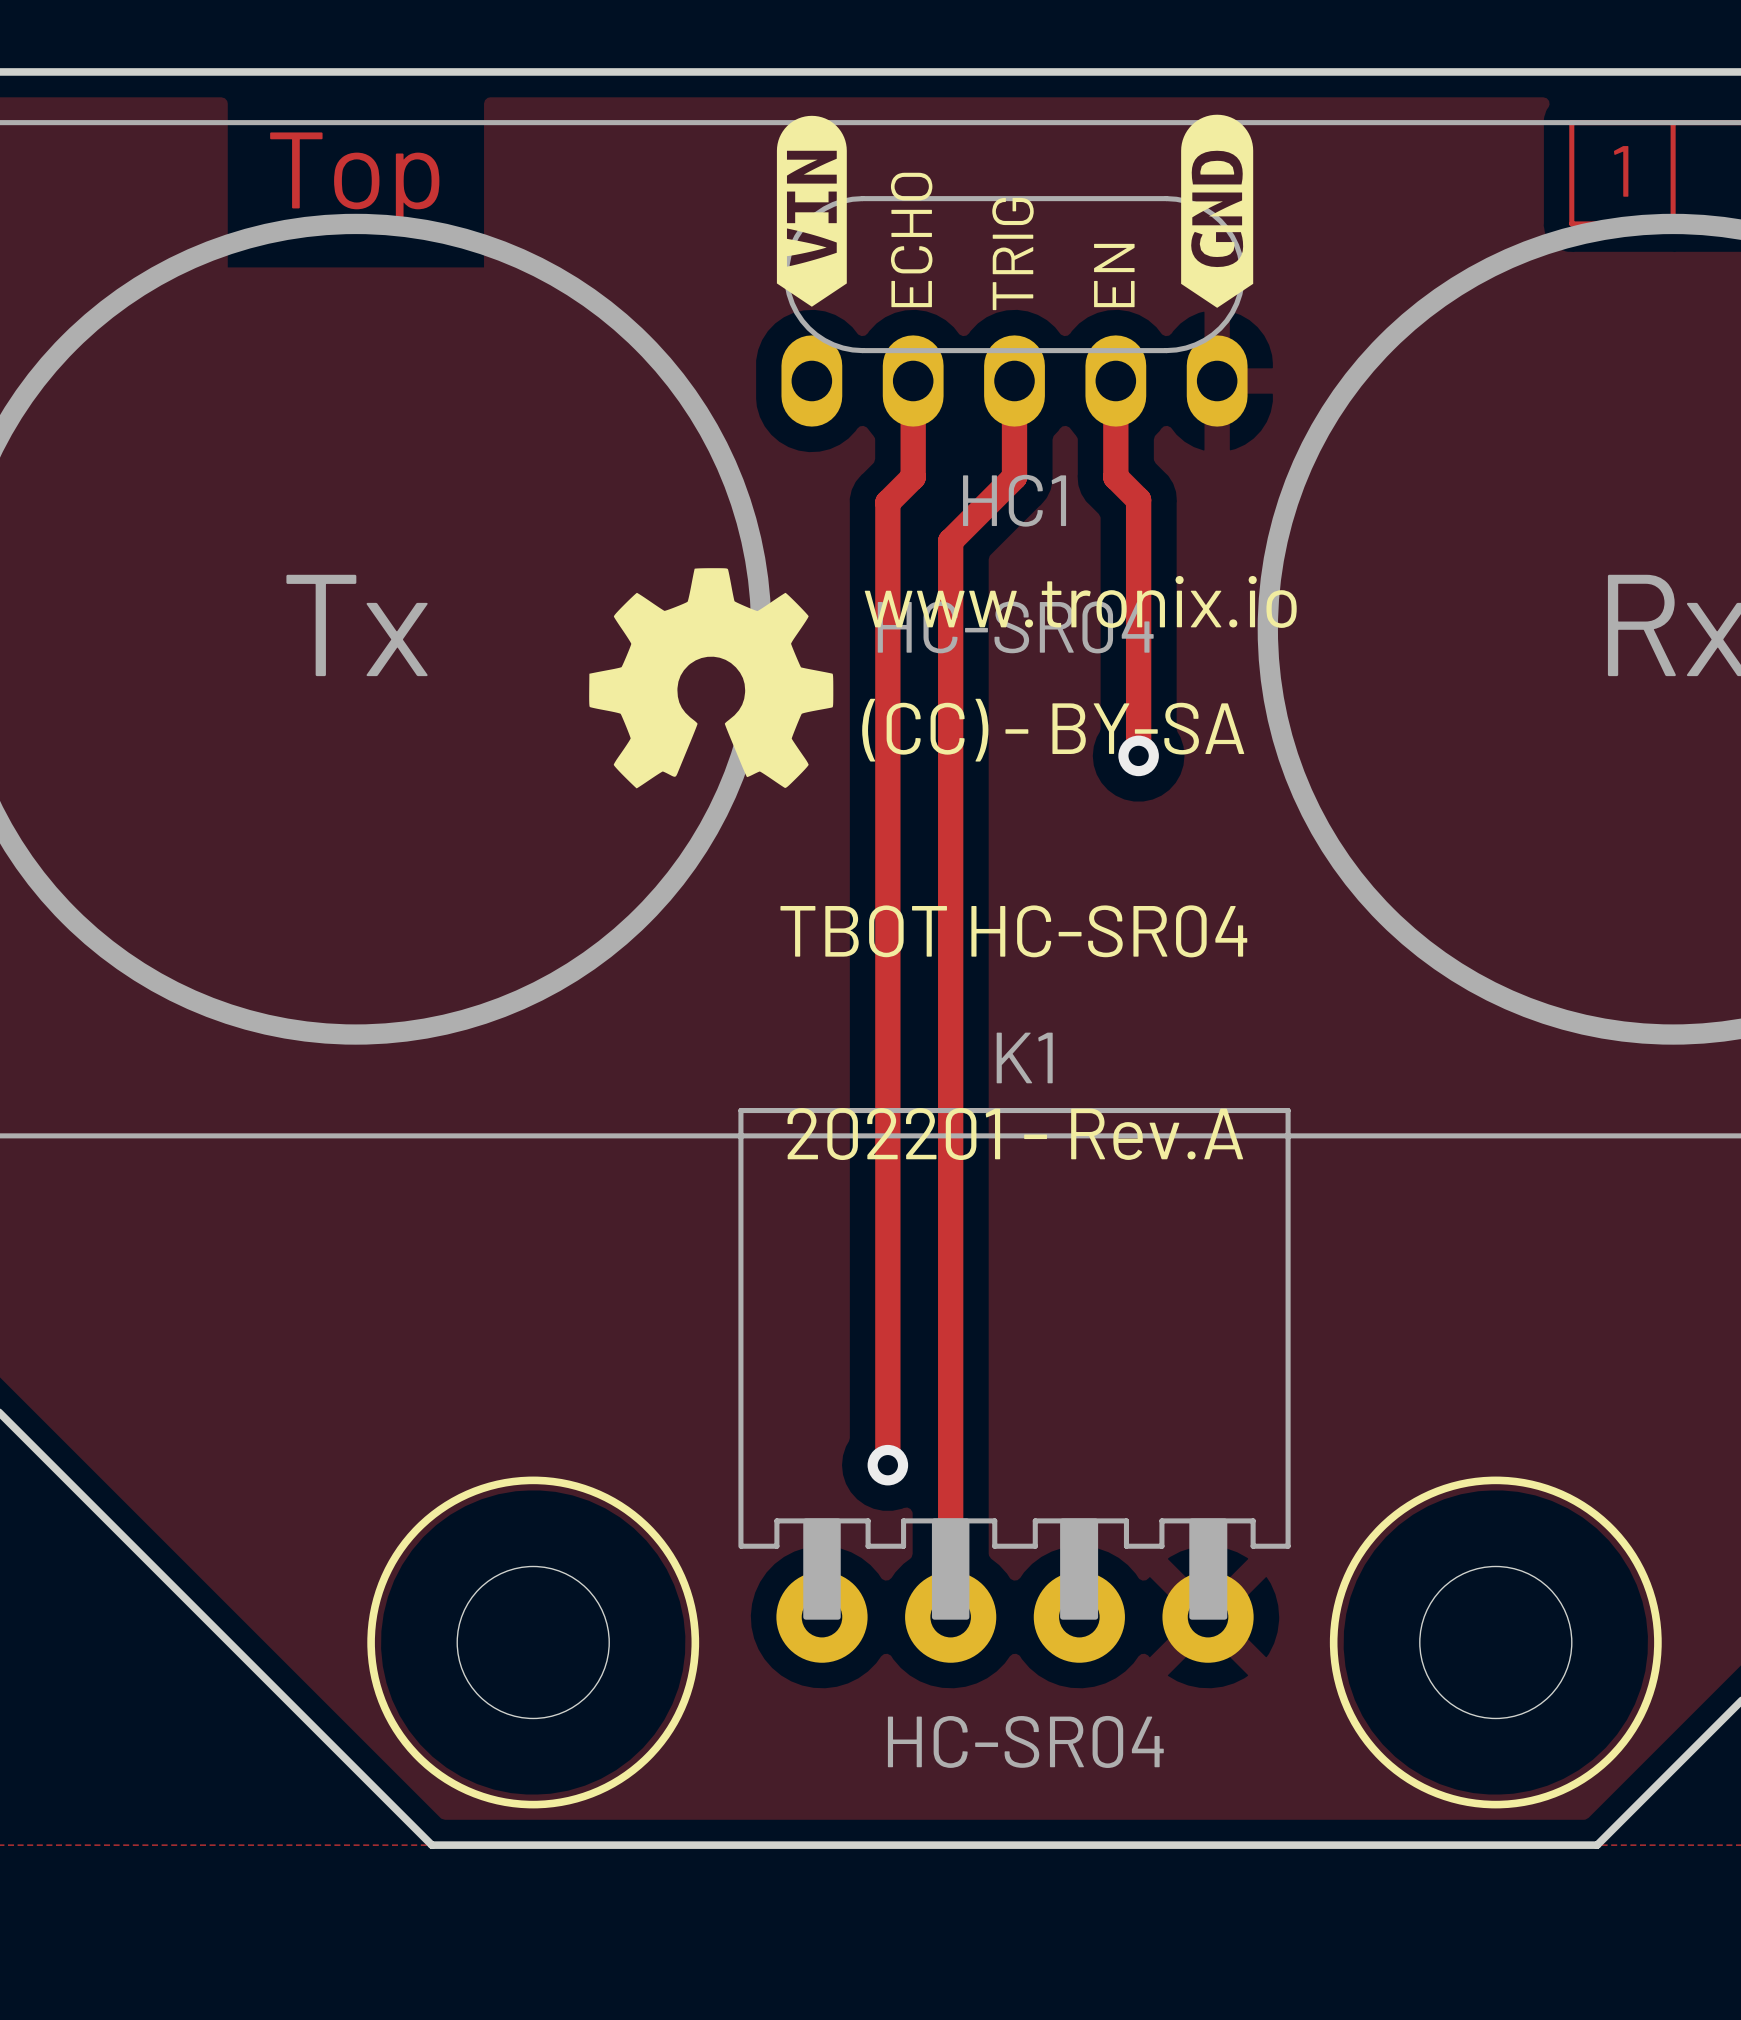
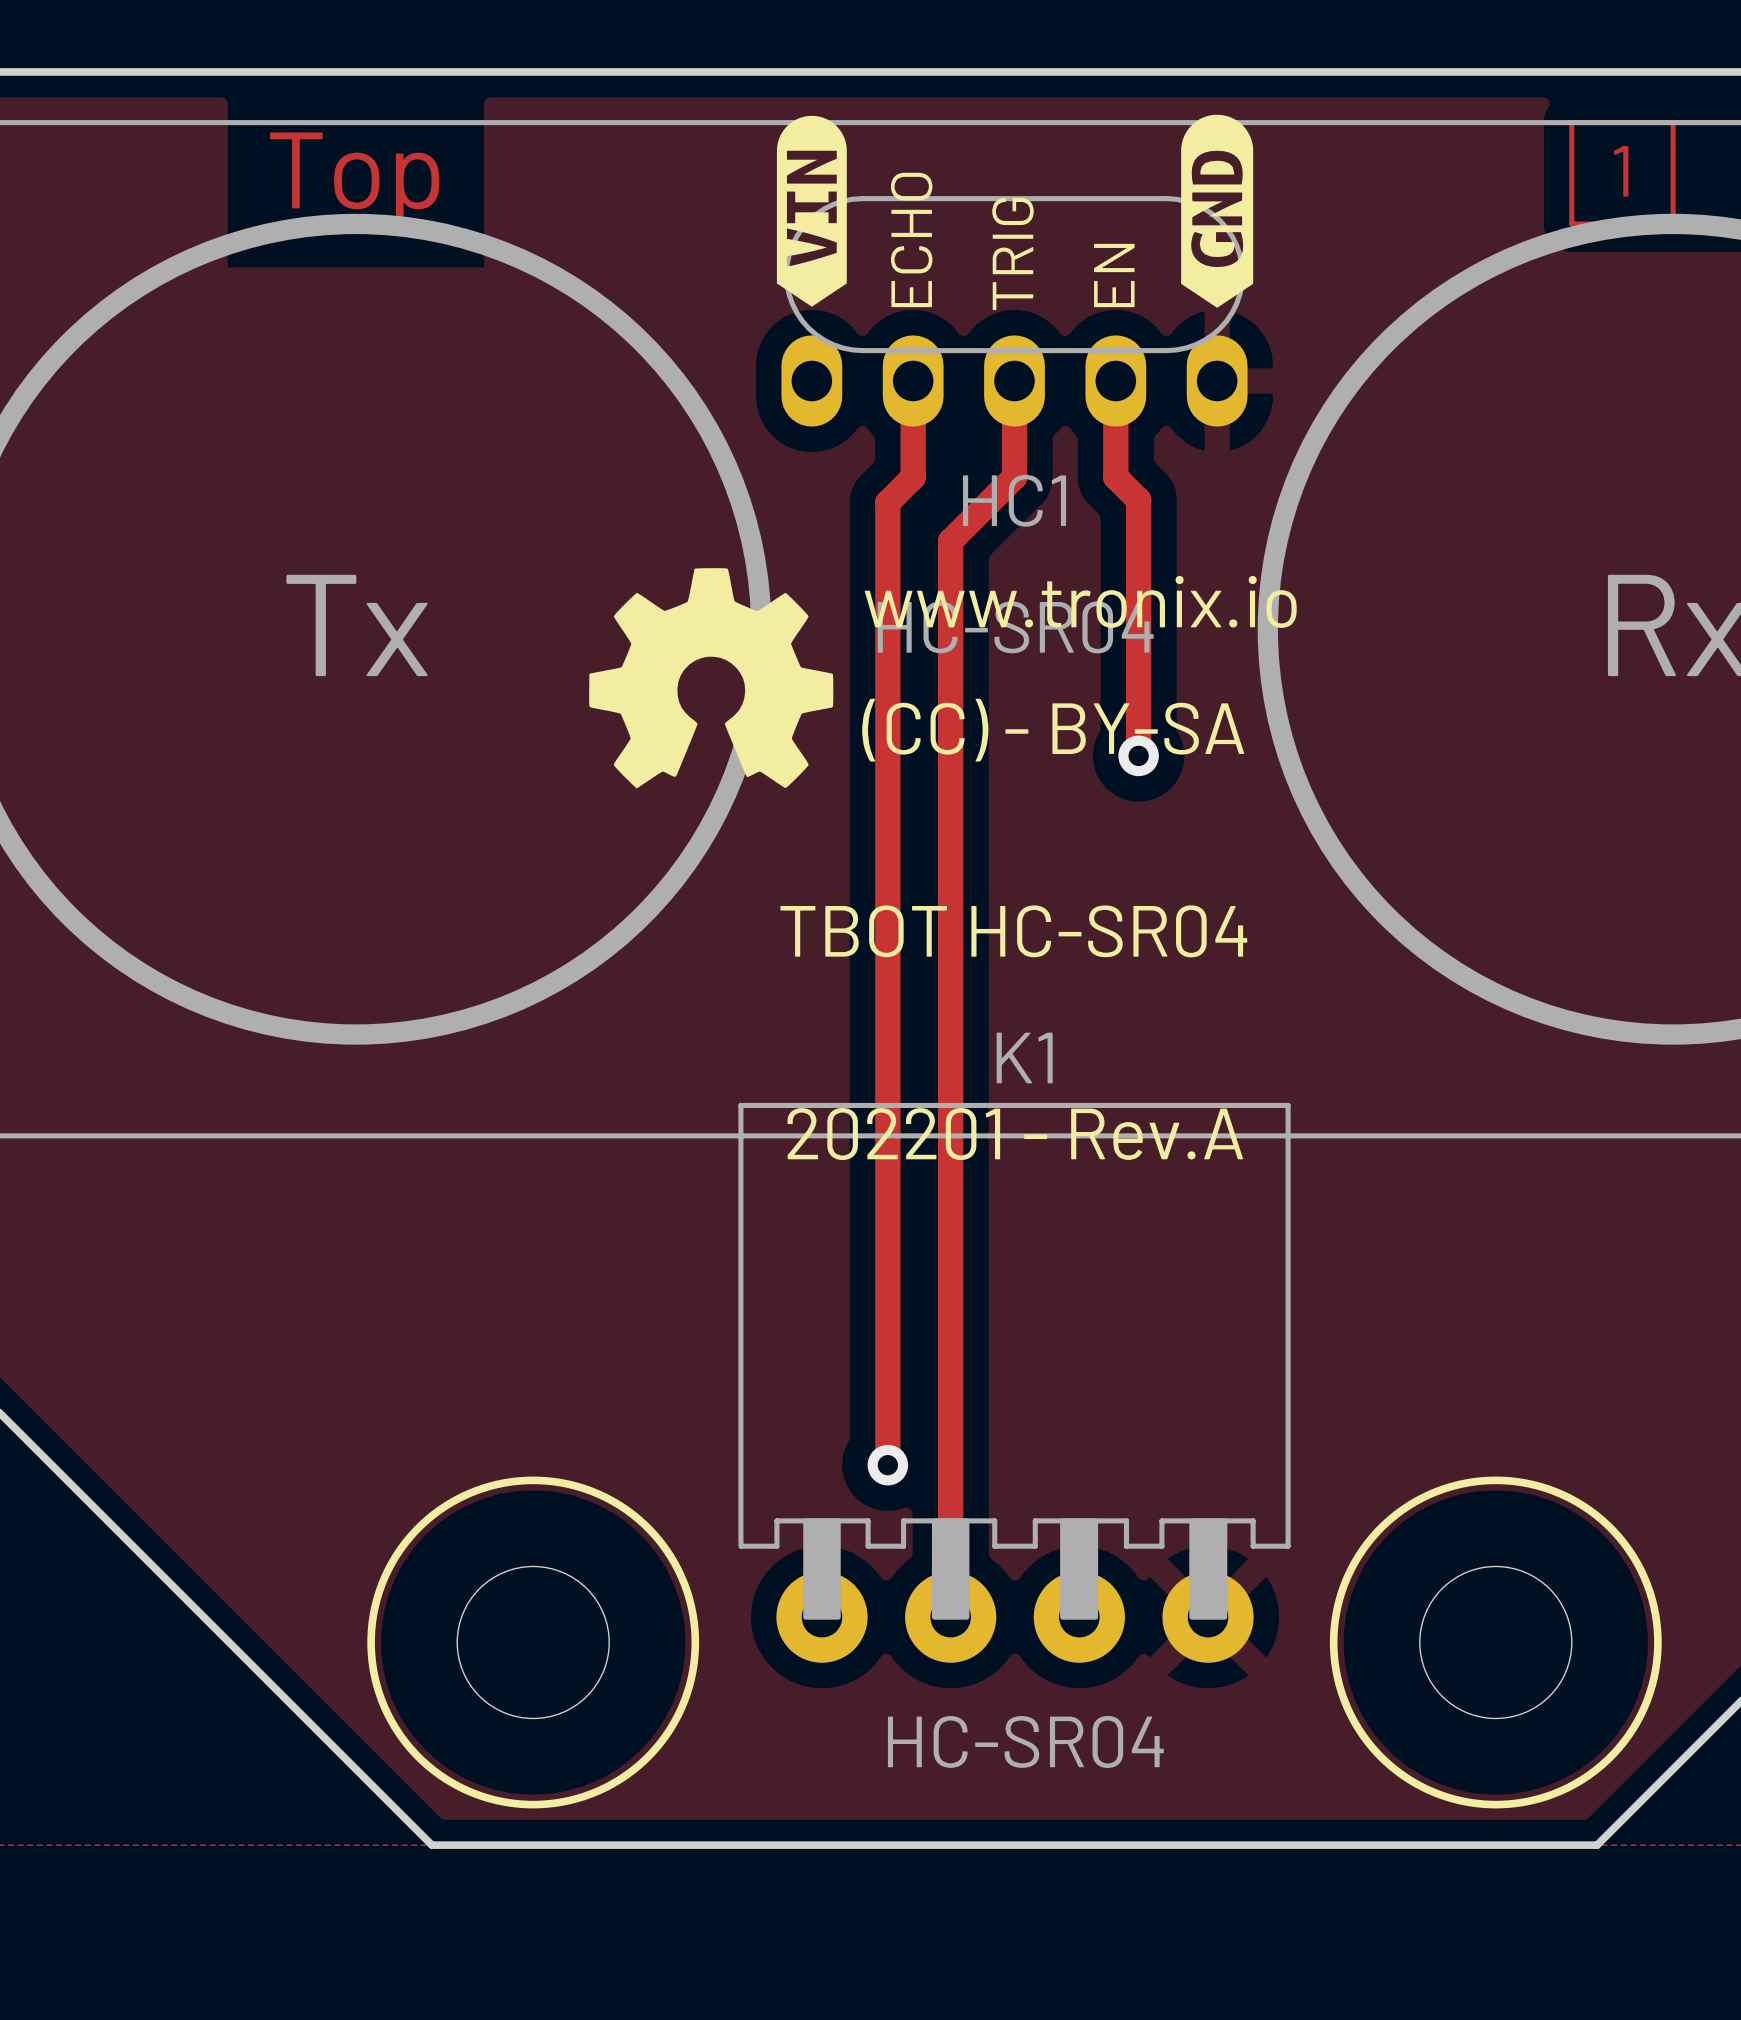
K1 footprint: [738, 1108, 1291, 1663] -> [738, 1102, 1291, 1663]

